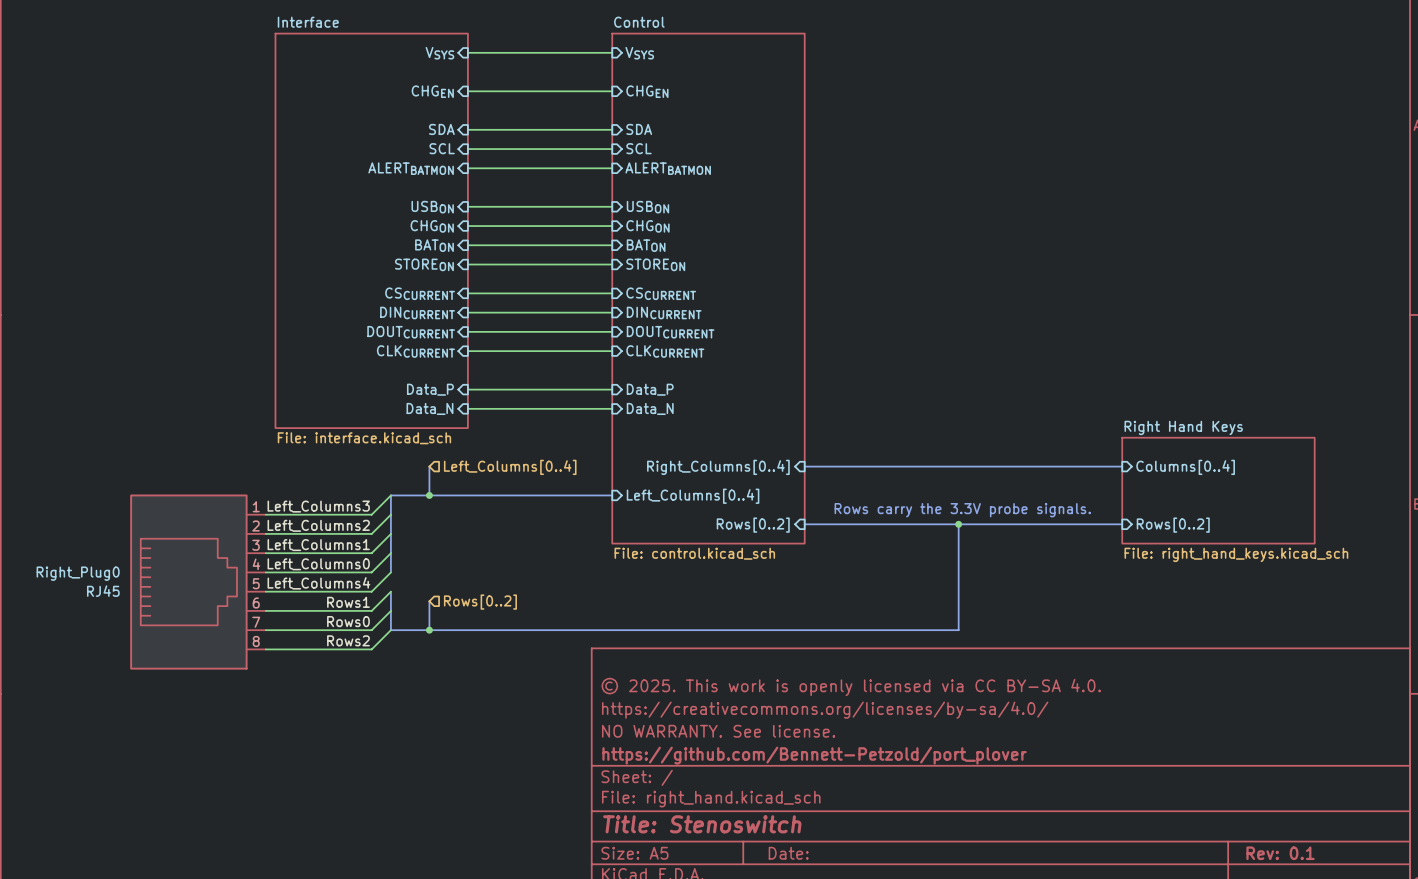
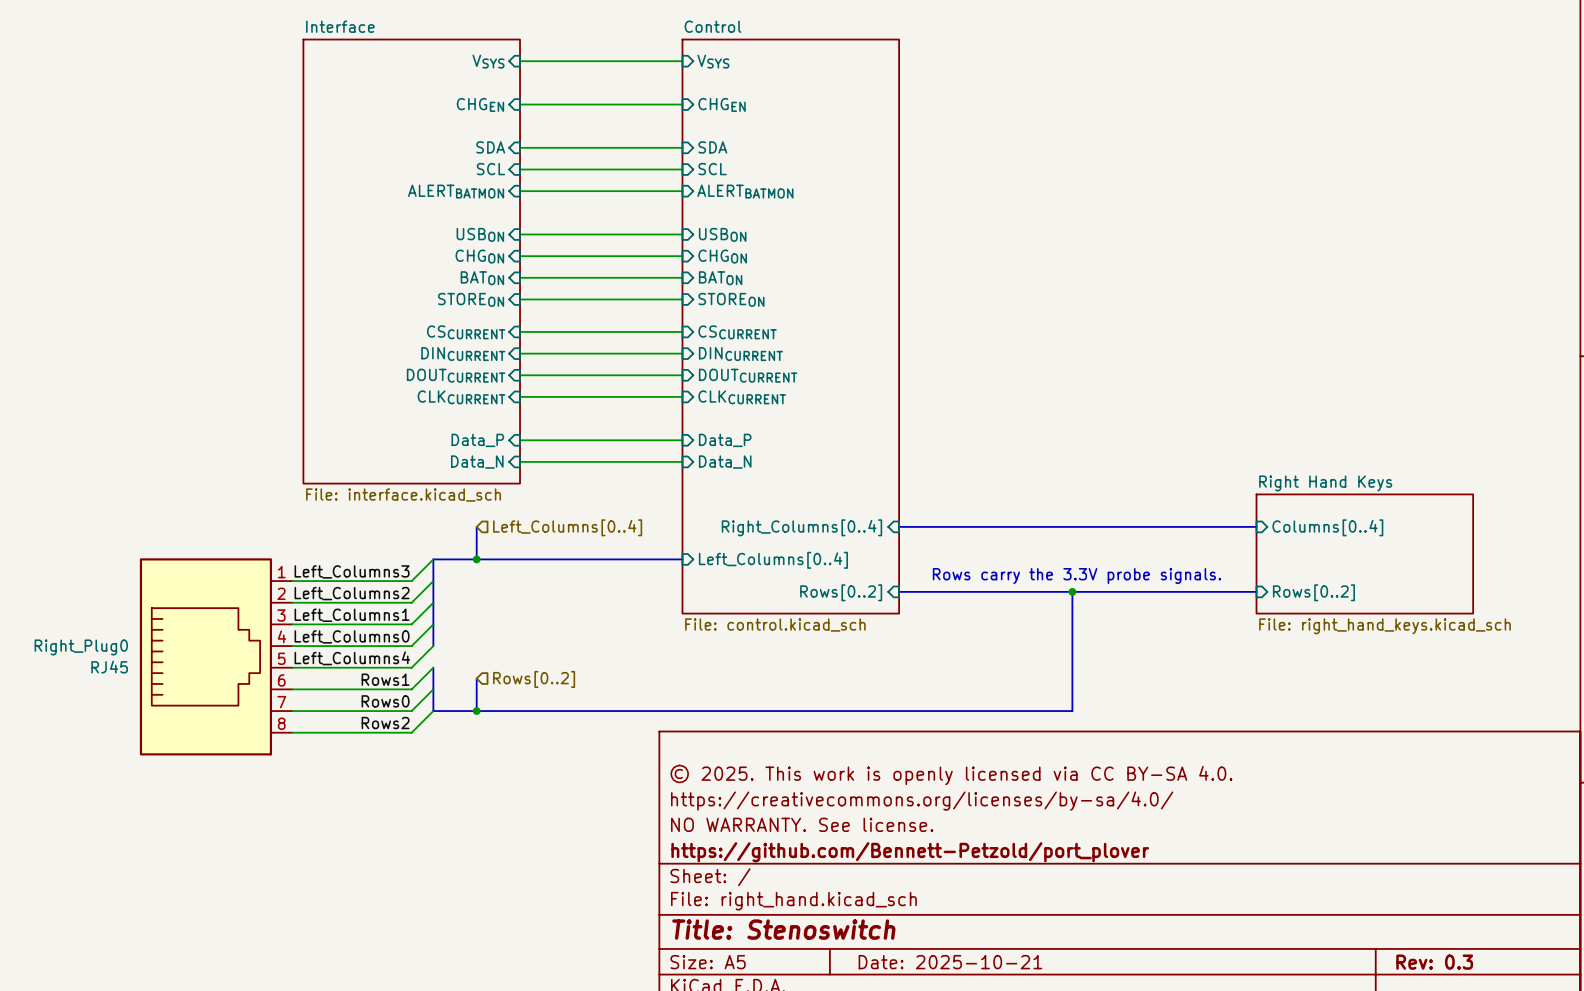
title block: Date: (788, 853) -> Date: 2025-10-21 (950, 962)
title block: Rev: 0.1 (1280, 853) -> Rev: 0.3 (1434, 962)

